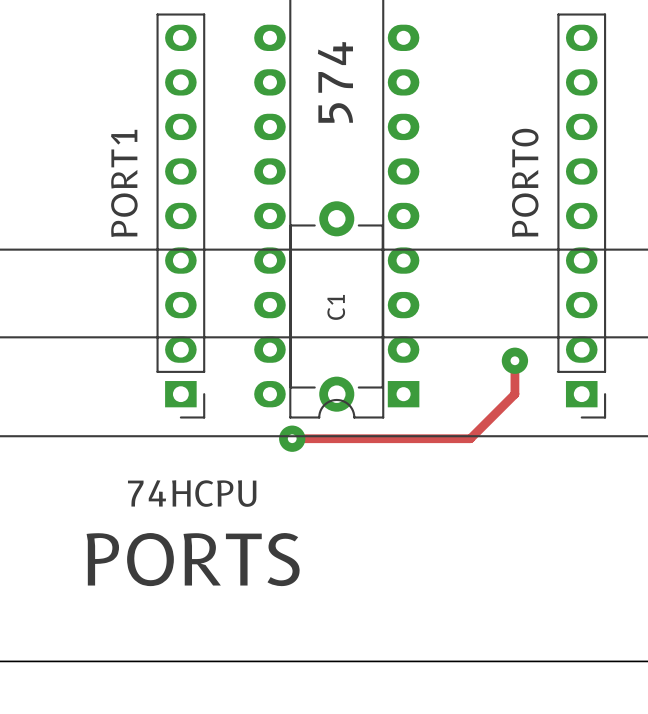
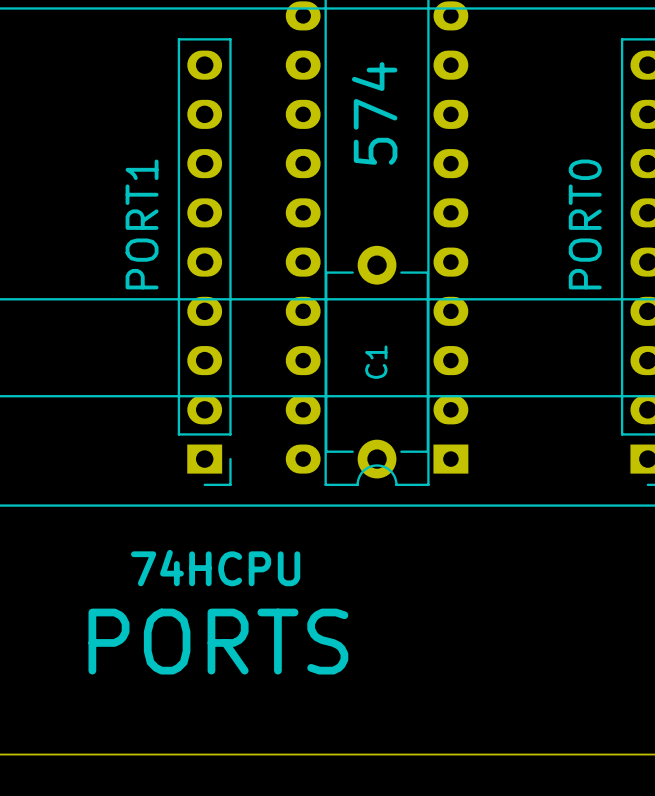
track: (514, 360) (514, 394) (470, 438) (292, 438) -> none
via: (514, 360) -> none
via: (292, 438) -> none

